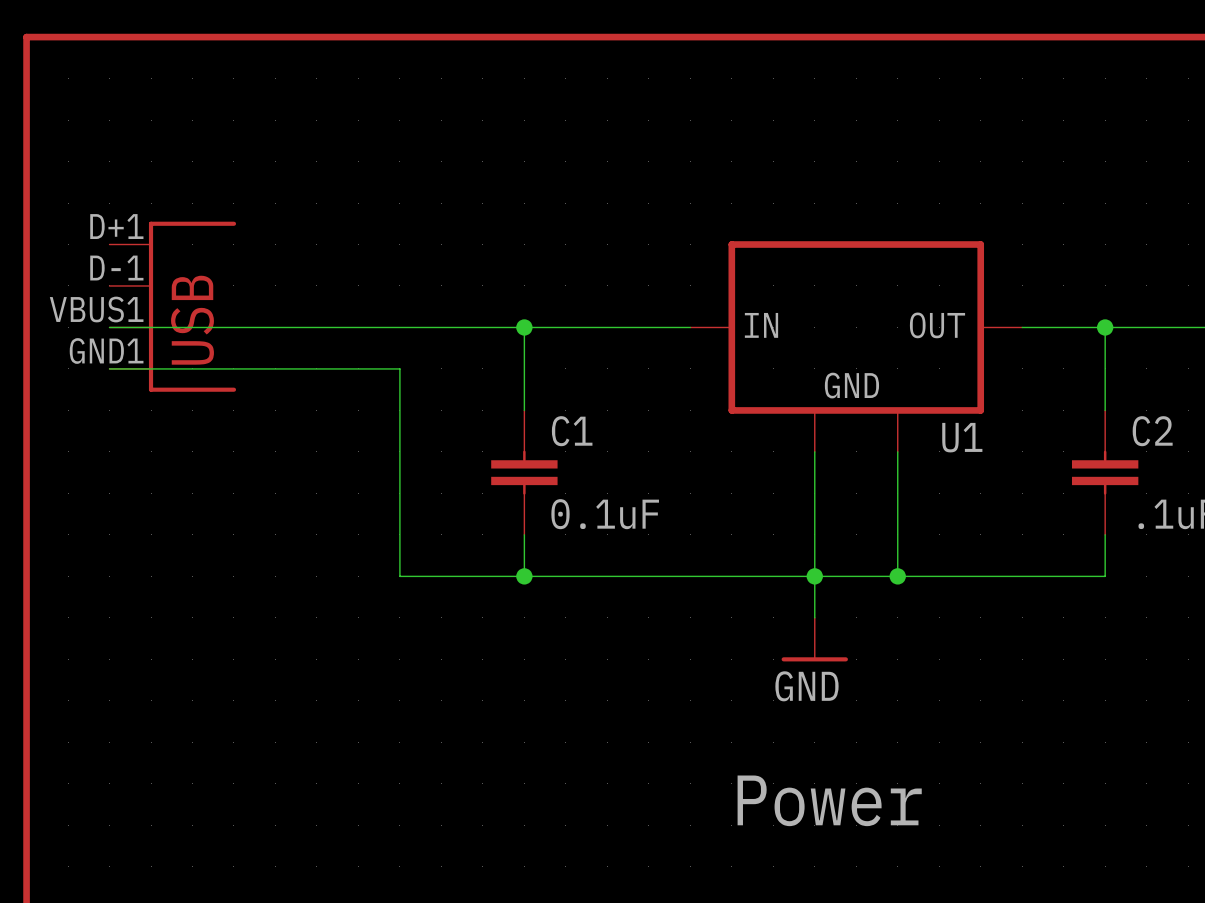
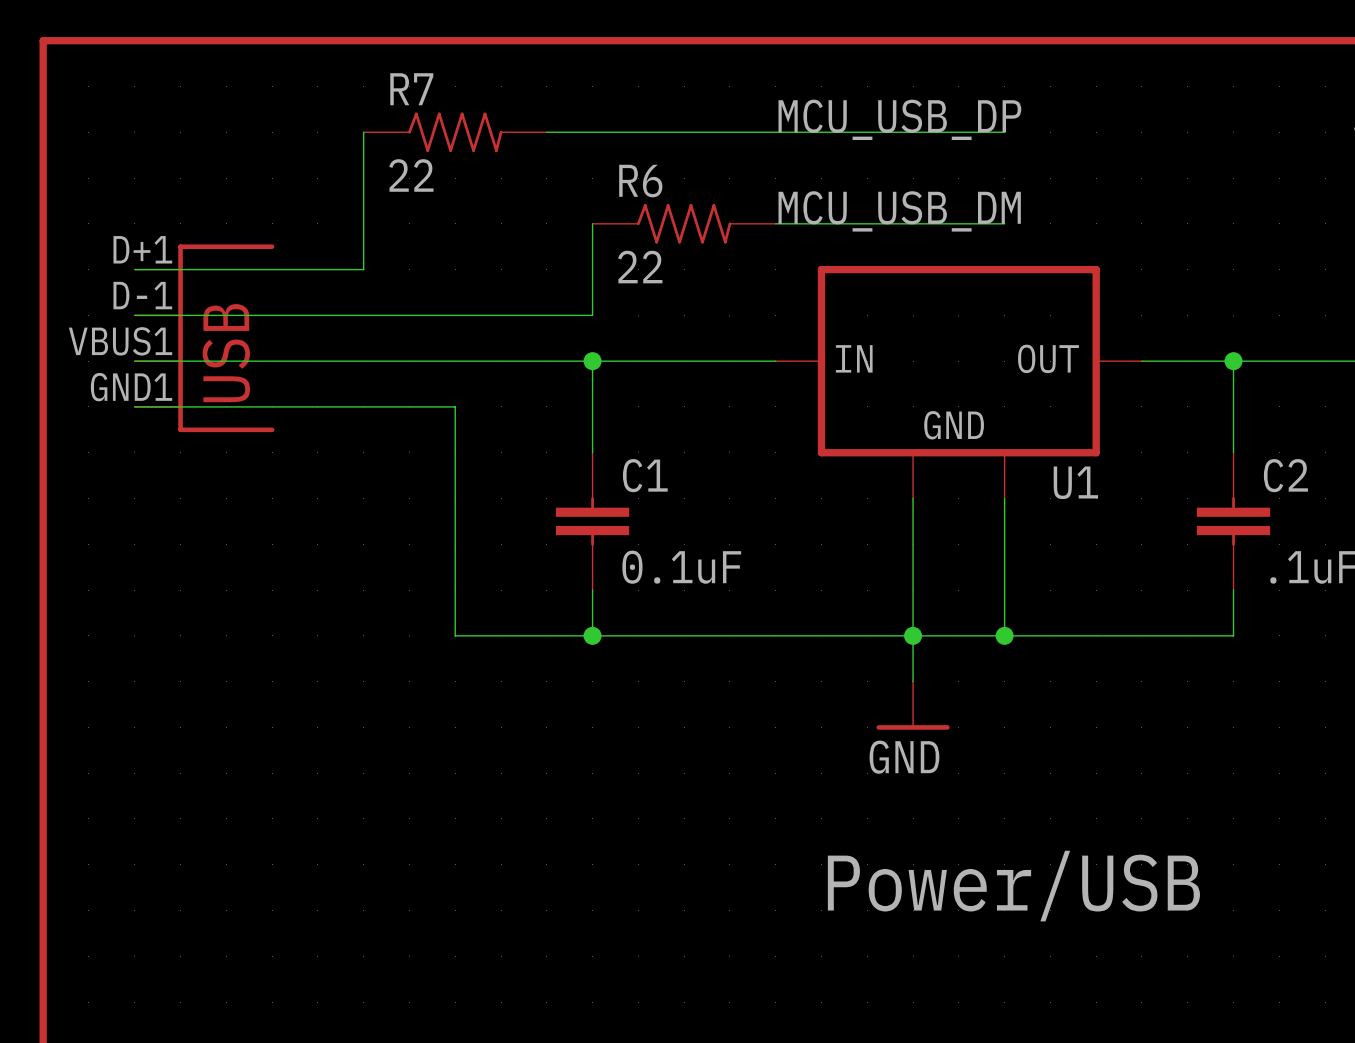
label: none -> MCU_USB_DP (899, 119)
wire: none -> (363, 132) (363, 269) (134, 269)
R7: none -> 22 (455, 132)
wire: none -> (546, 132) (1004, 132)
label: none -> MCU_USB_DM (899, 211)
wire: none -> (592, 223) (592, 315) (134, 315)
R6: none -> 22 (684, 223)
wire: none -> (775, 223) (1004, 223)
text: Power (829, 800) -> Power/USB (1013, 886)

